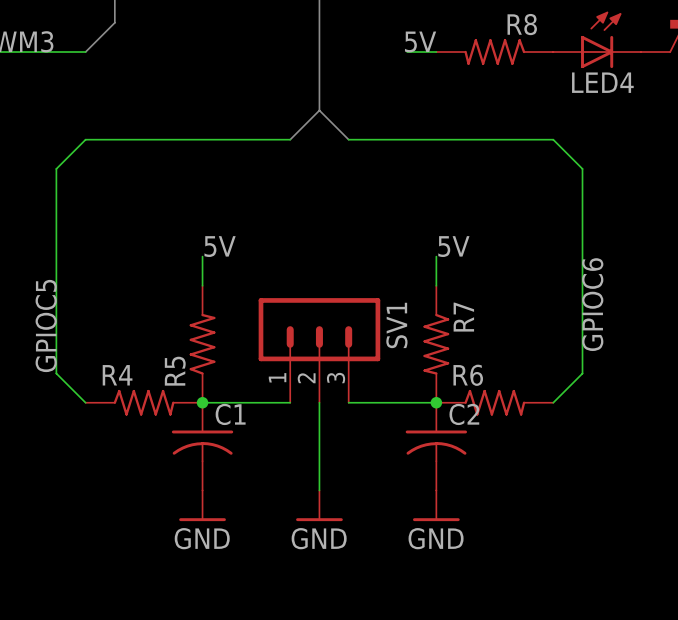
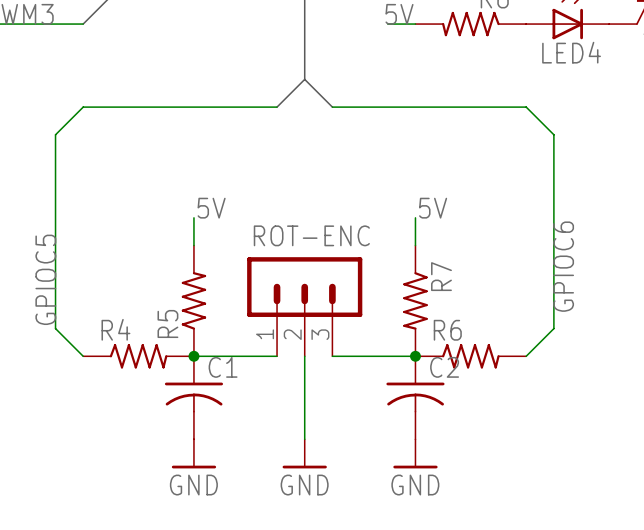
SV1 name: SV1 (396, 325) -> ROT-ENC (311, 235)

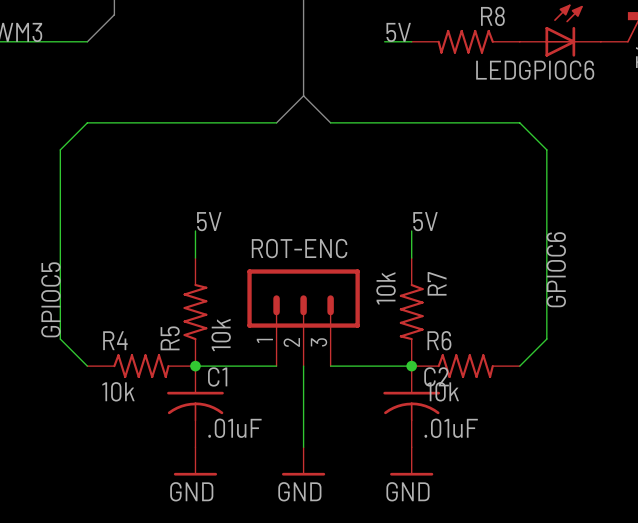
LED4 name: LED4 (571, 52) -> LEDGPIOC6 (535, 70)
R7 value: none -> 10k (386, 288)
R5 value: none -> 10k (221, 335)
R4 value: none -> 10k (118, 391)
R6 value: none -> 10k (442, 391)
C1 value: none -> .01uF (234, 428)
C2 value: none -> .01uF (451, 428)

